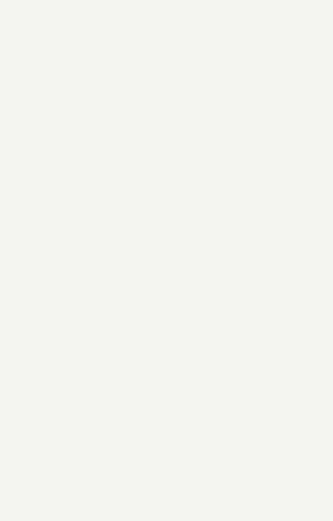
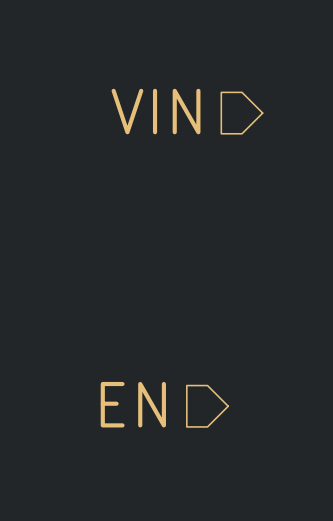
hierarchical label: none -> VIN (156, 111)
hierarchical label: none -> EN (133, 404)

